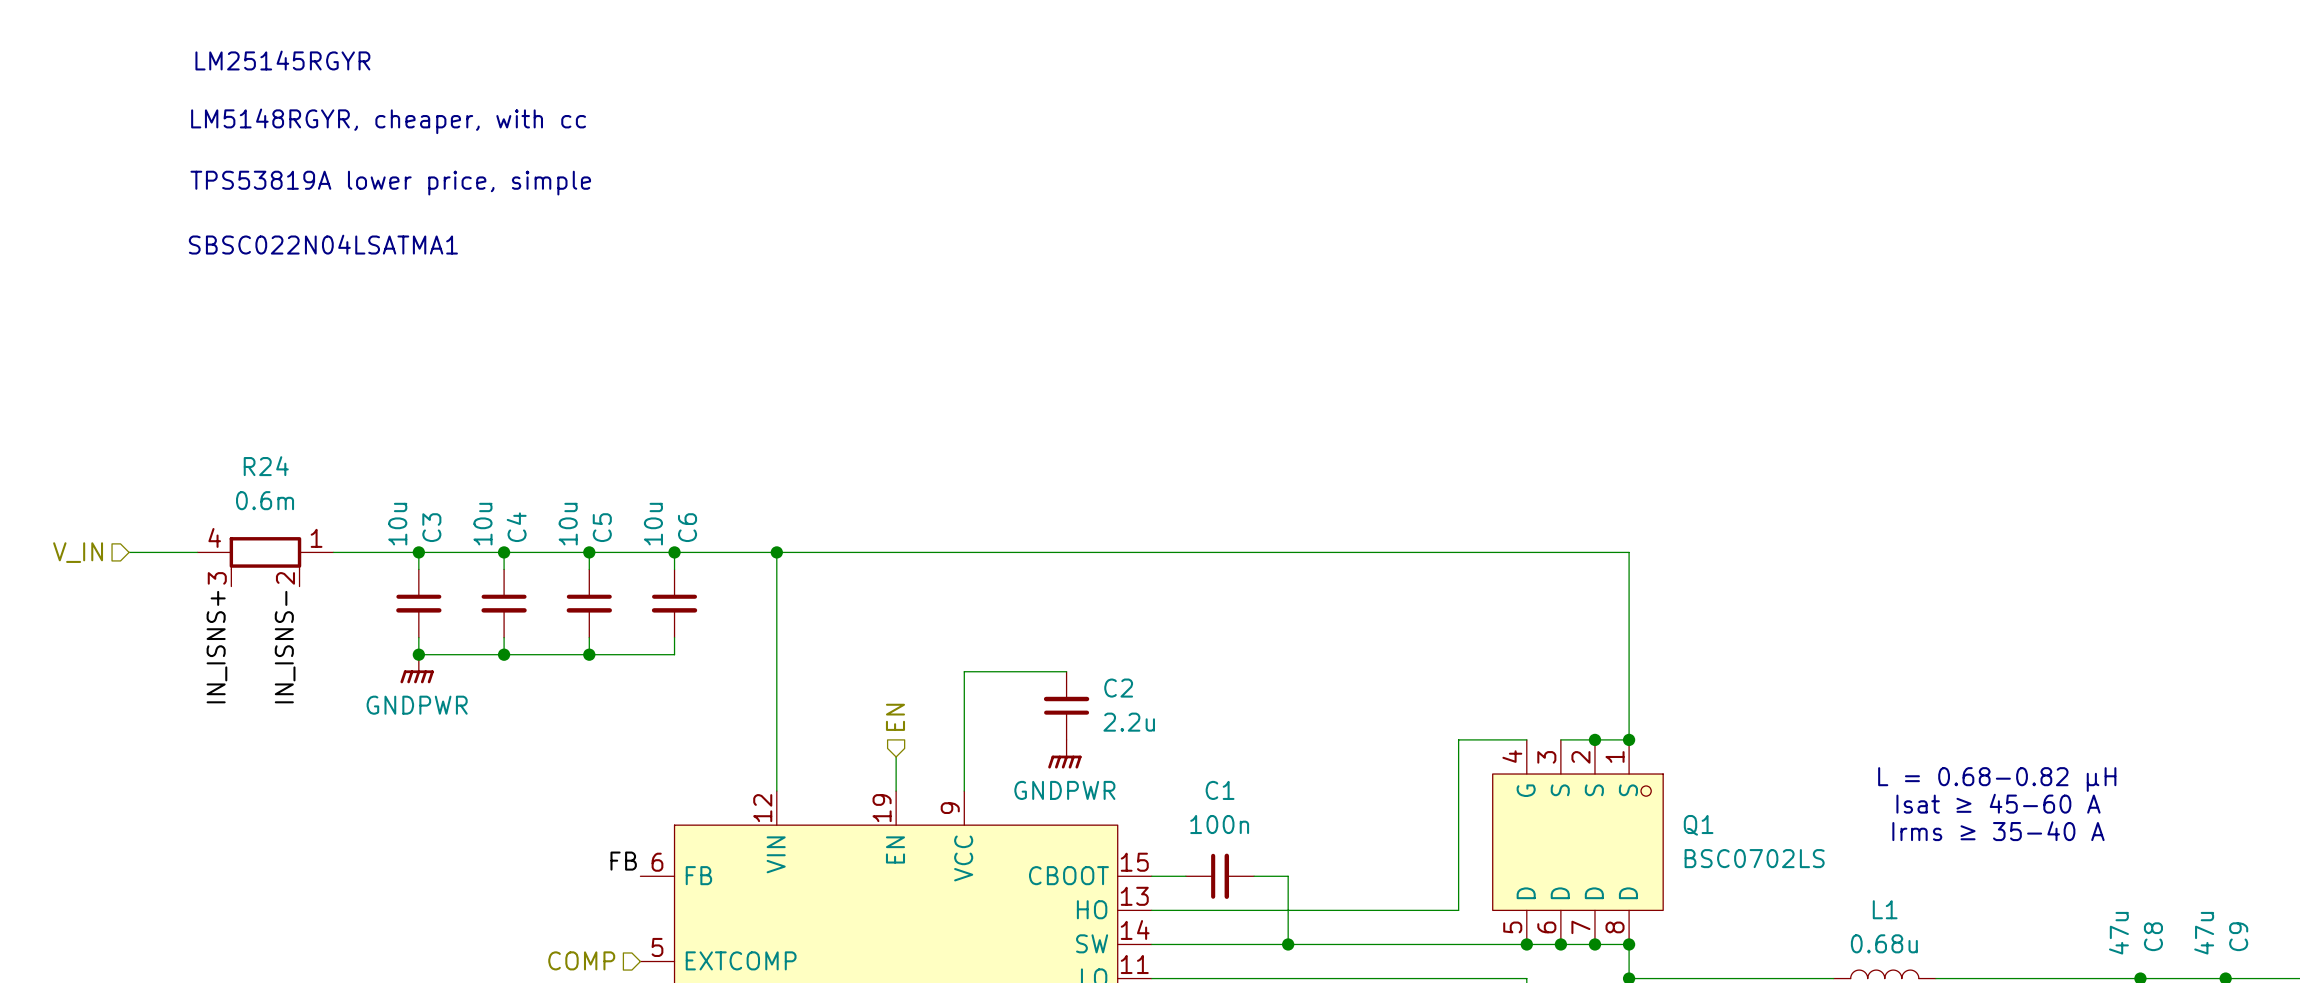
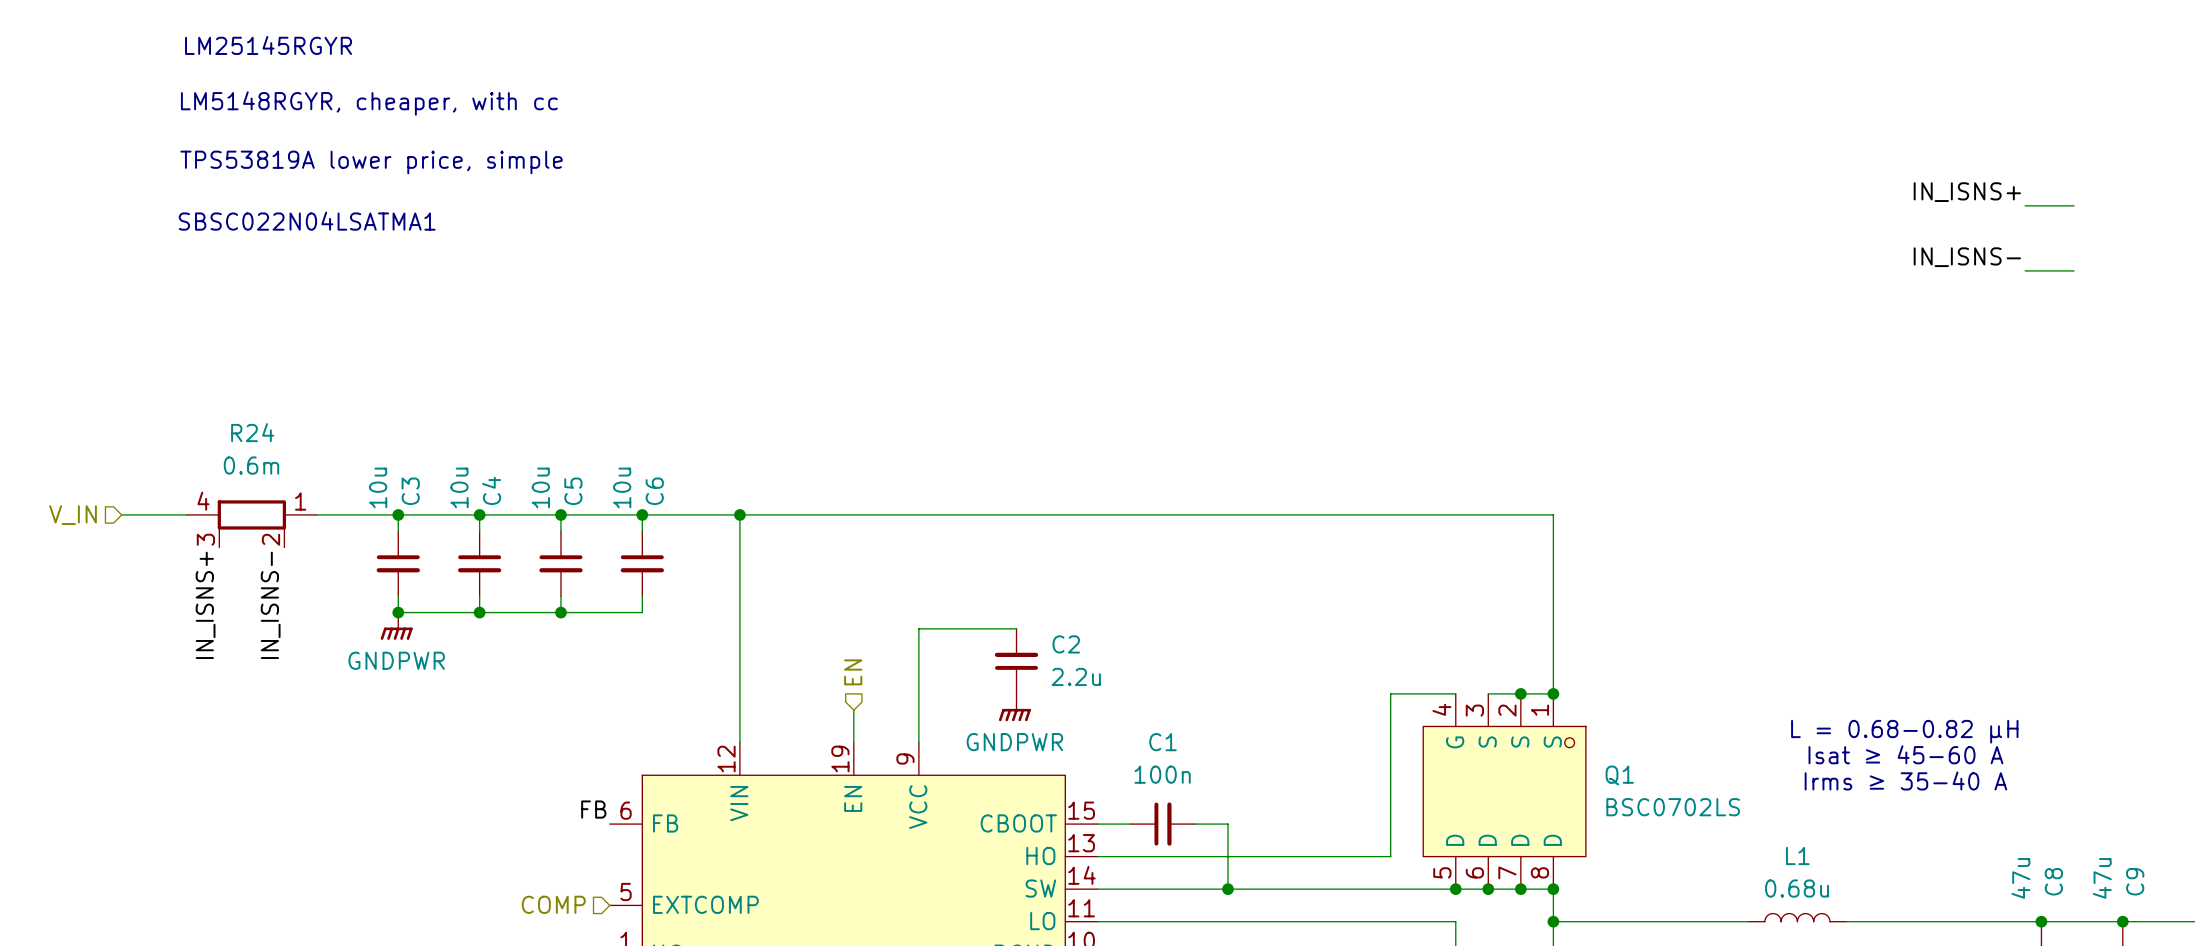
label: none -> IN_ISNS+ (1967, 192)
wire: none -> (2025, 205) (2073, 205)
label: none -> IN_ISNS- (1967, 257)
wire: none -> (2025, 270) (2073, 270)

